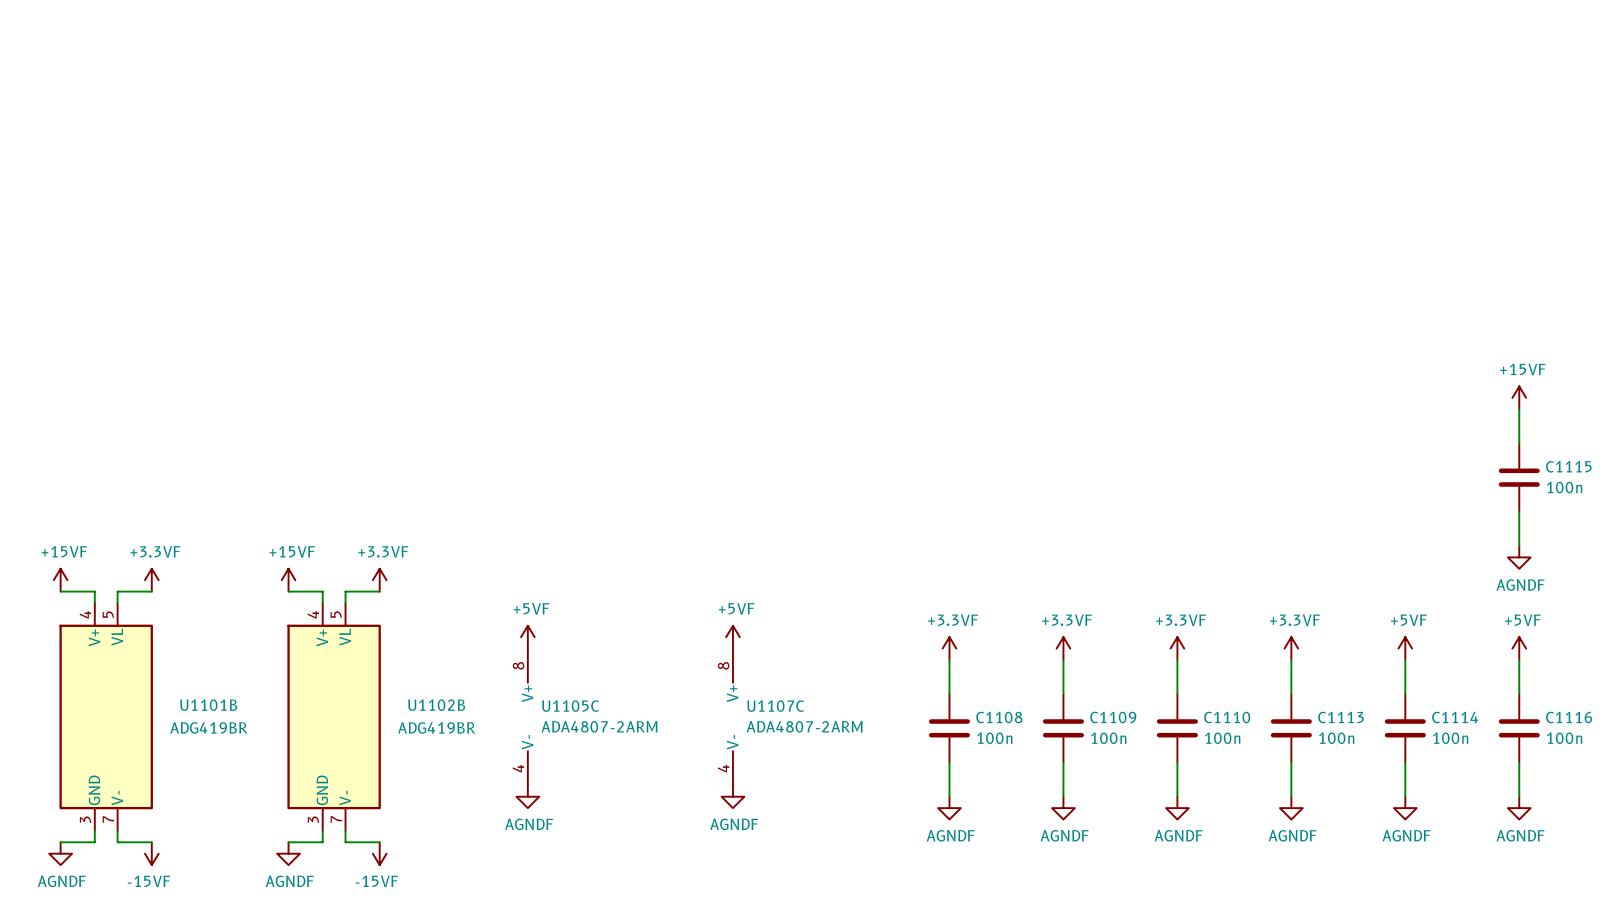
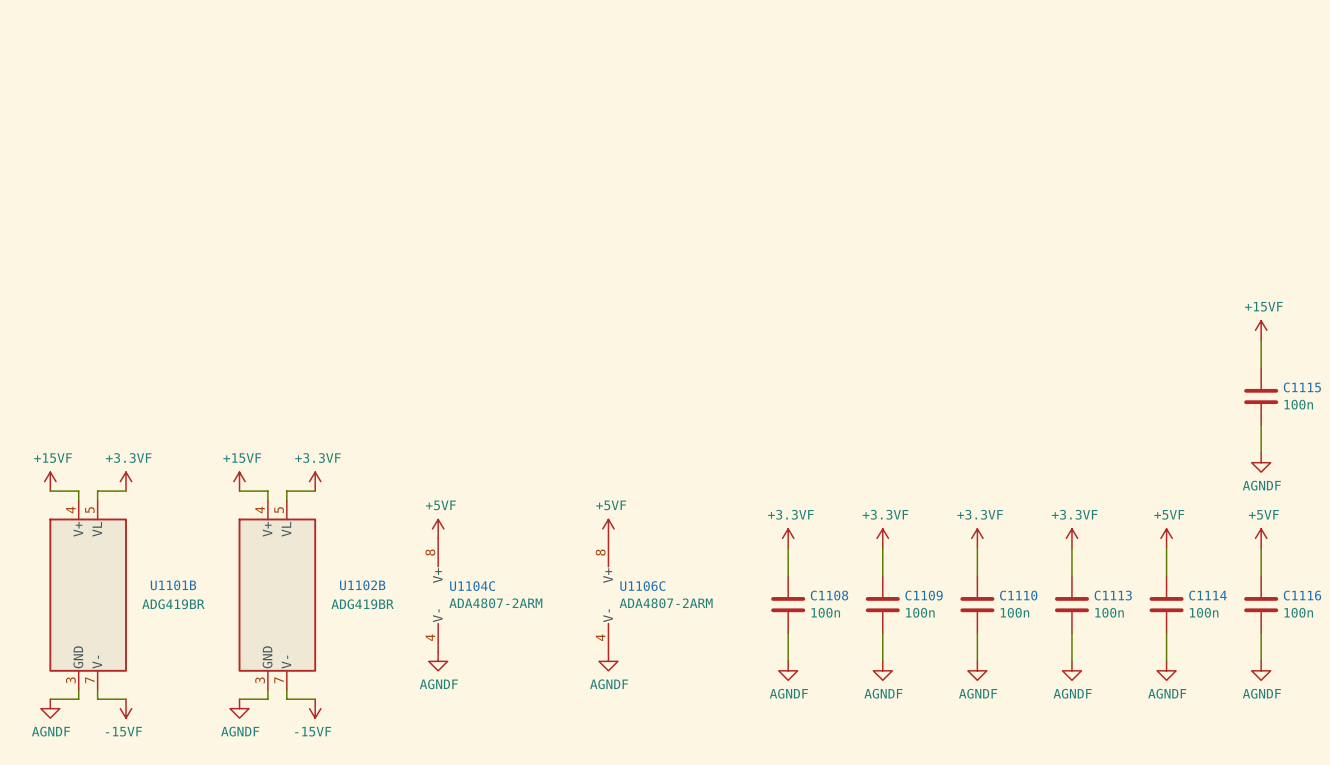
U1105C name: U1105C (570, 706) -> U1104C (472, 586)
U1107C name: U1107C (775, 706) -> U1106C (642, 586)

